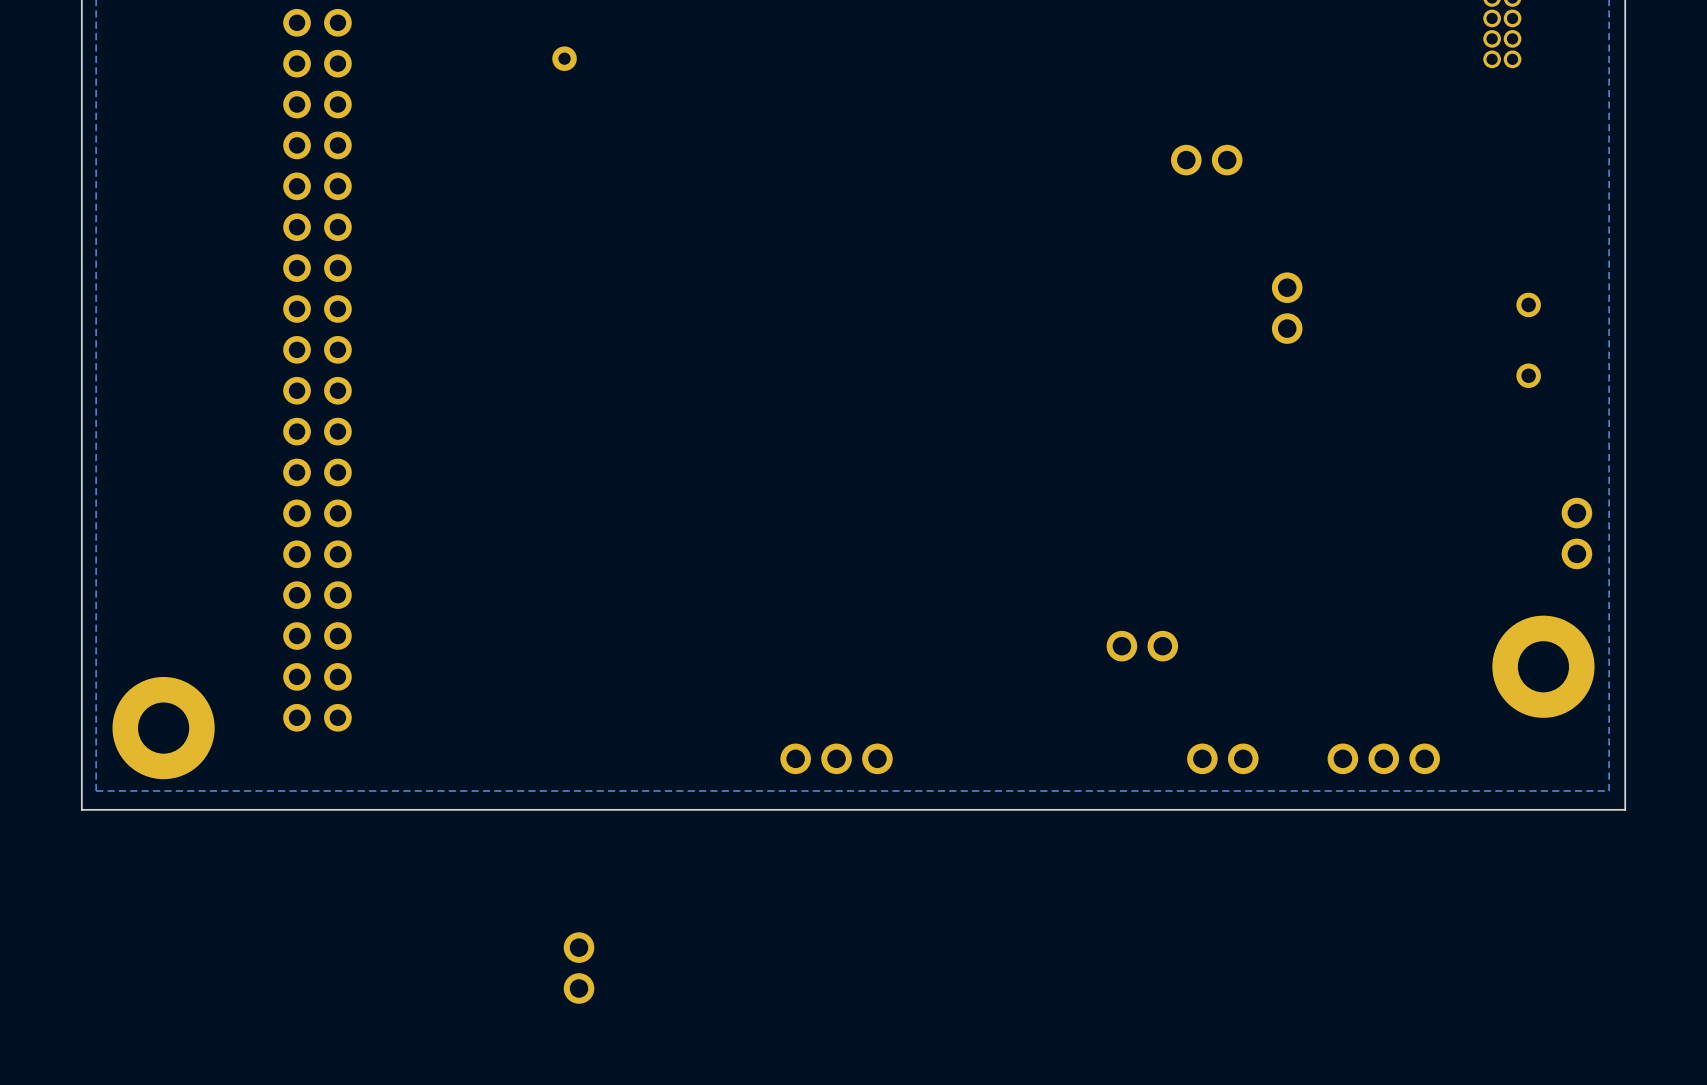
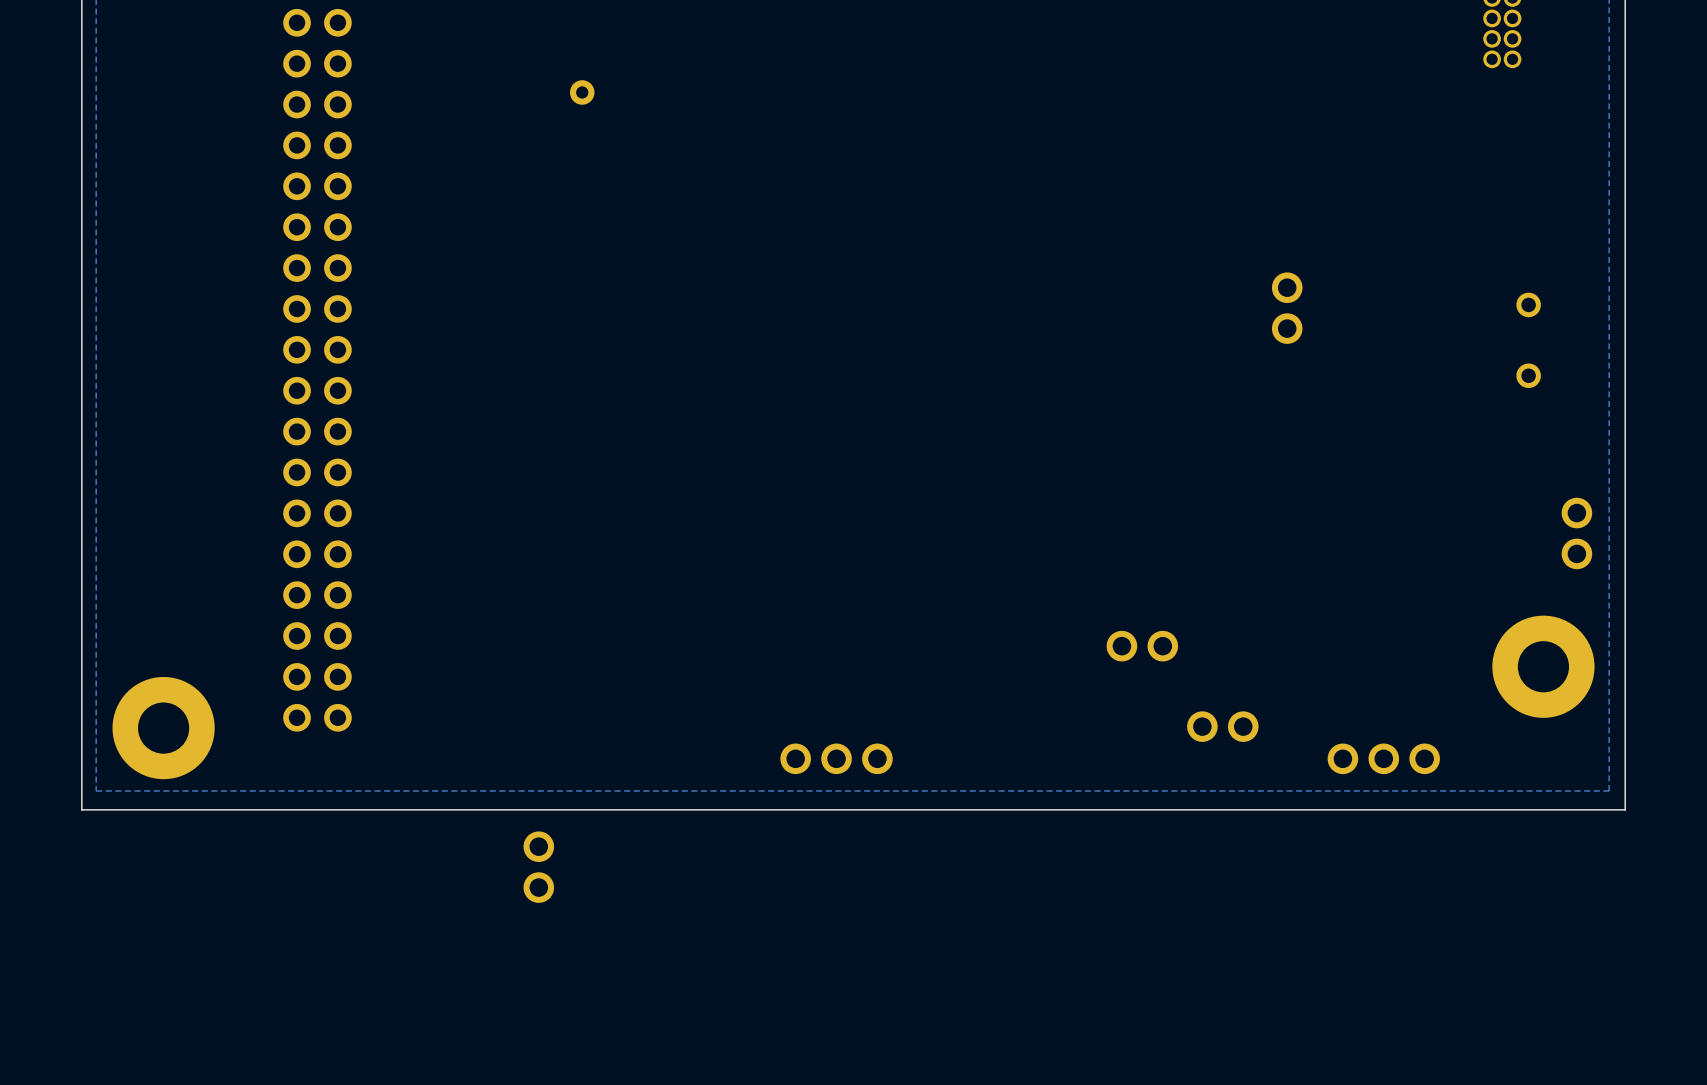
part position: (564, 58) -> (582, 92)
part: (1206, 160) -> none
part position: (1222, 758) -> (1222, 726)
part position: (579, 968) -> (538, 867)

